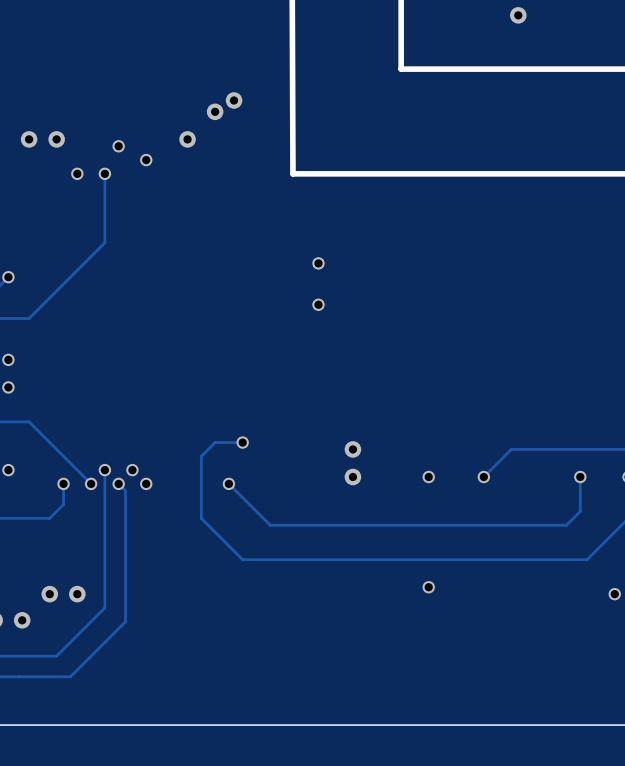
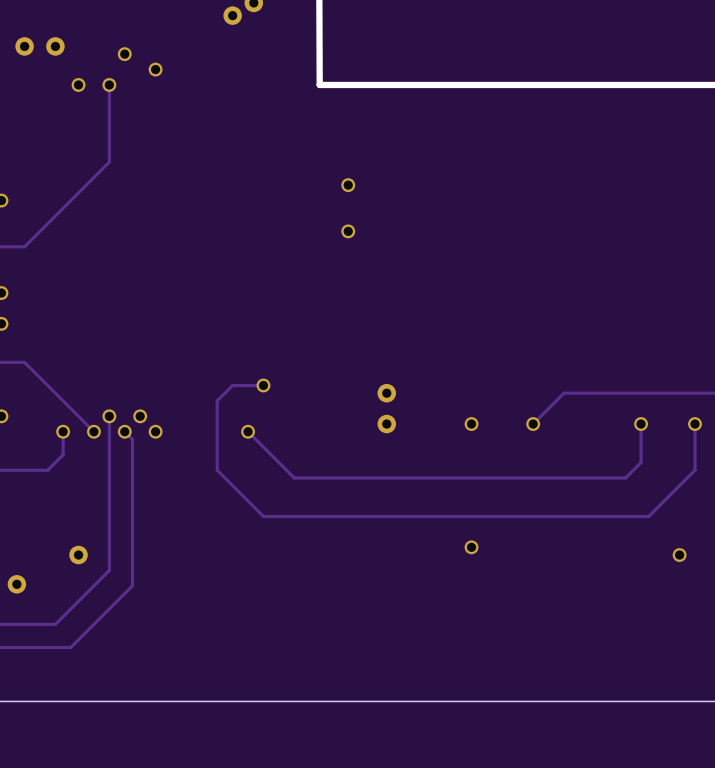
via: (187, 139) -> none
via: (49, 594) -> none

